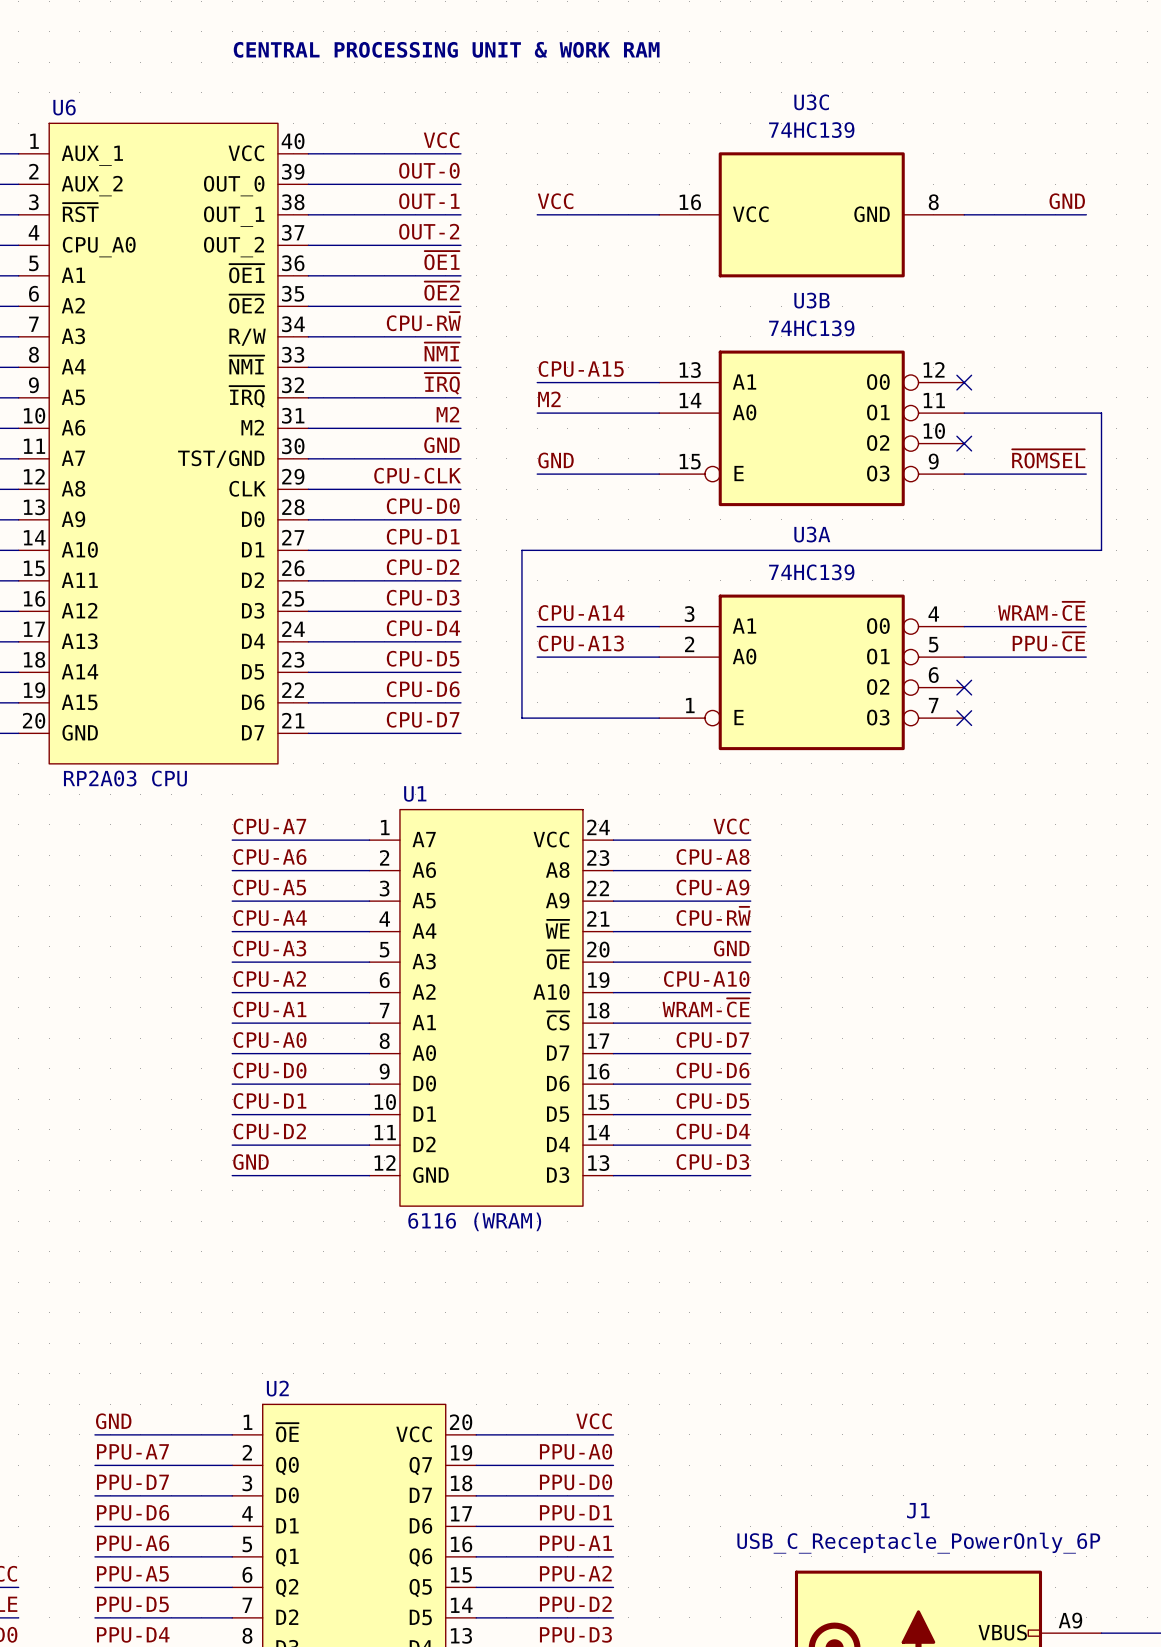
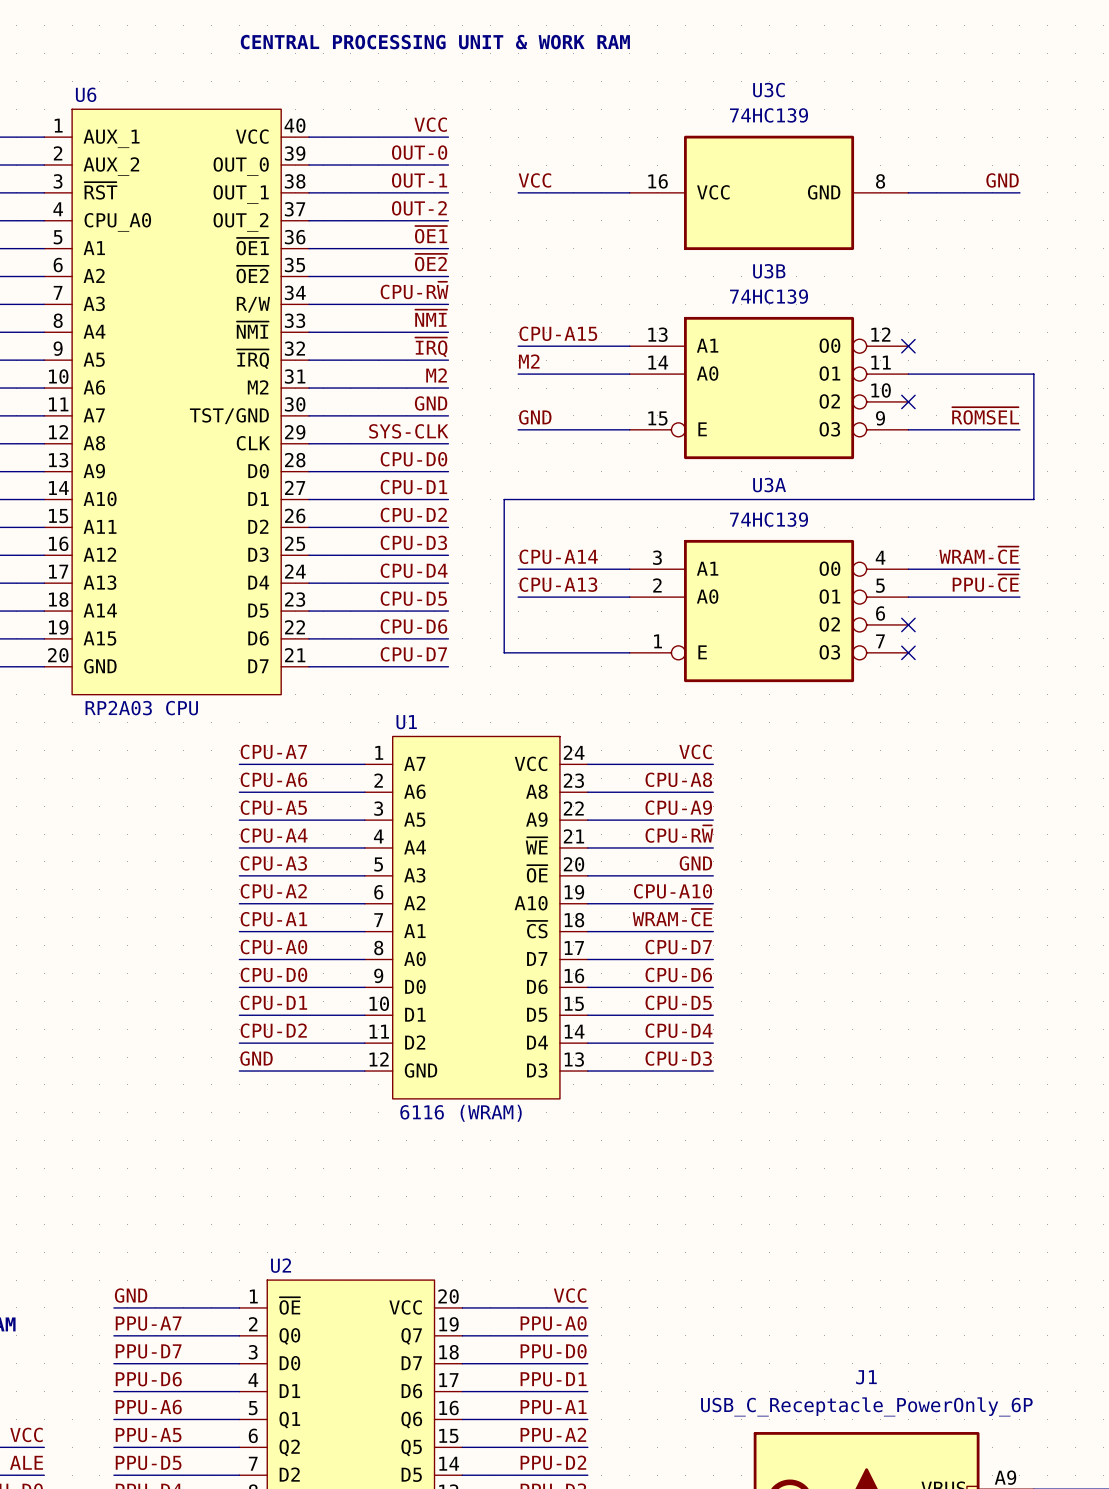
label: CPU-CLK (417, 475) -> SYS-CLK (408, 431)

